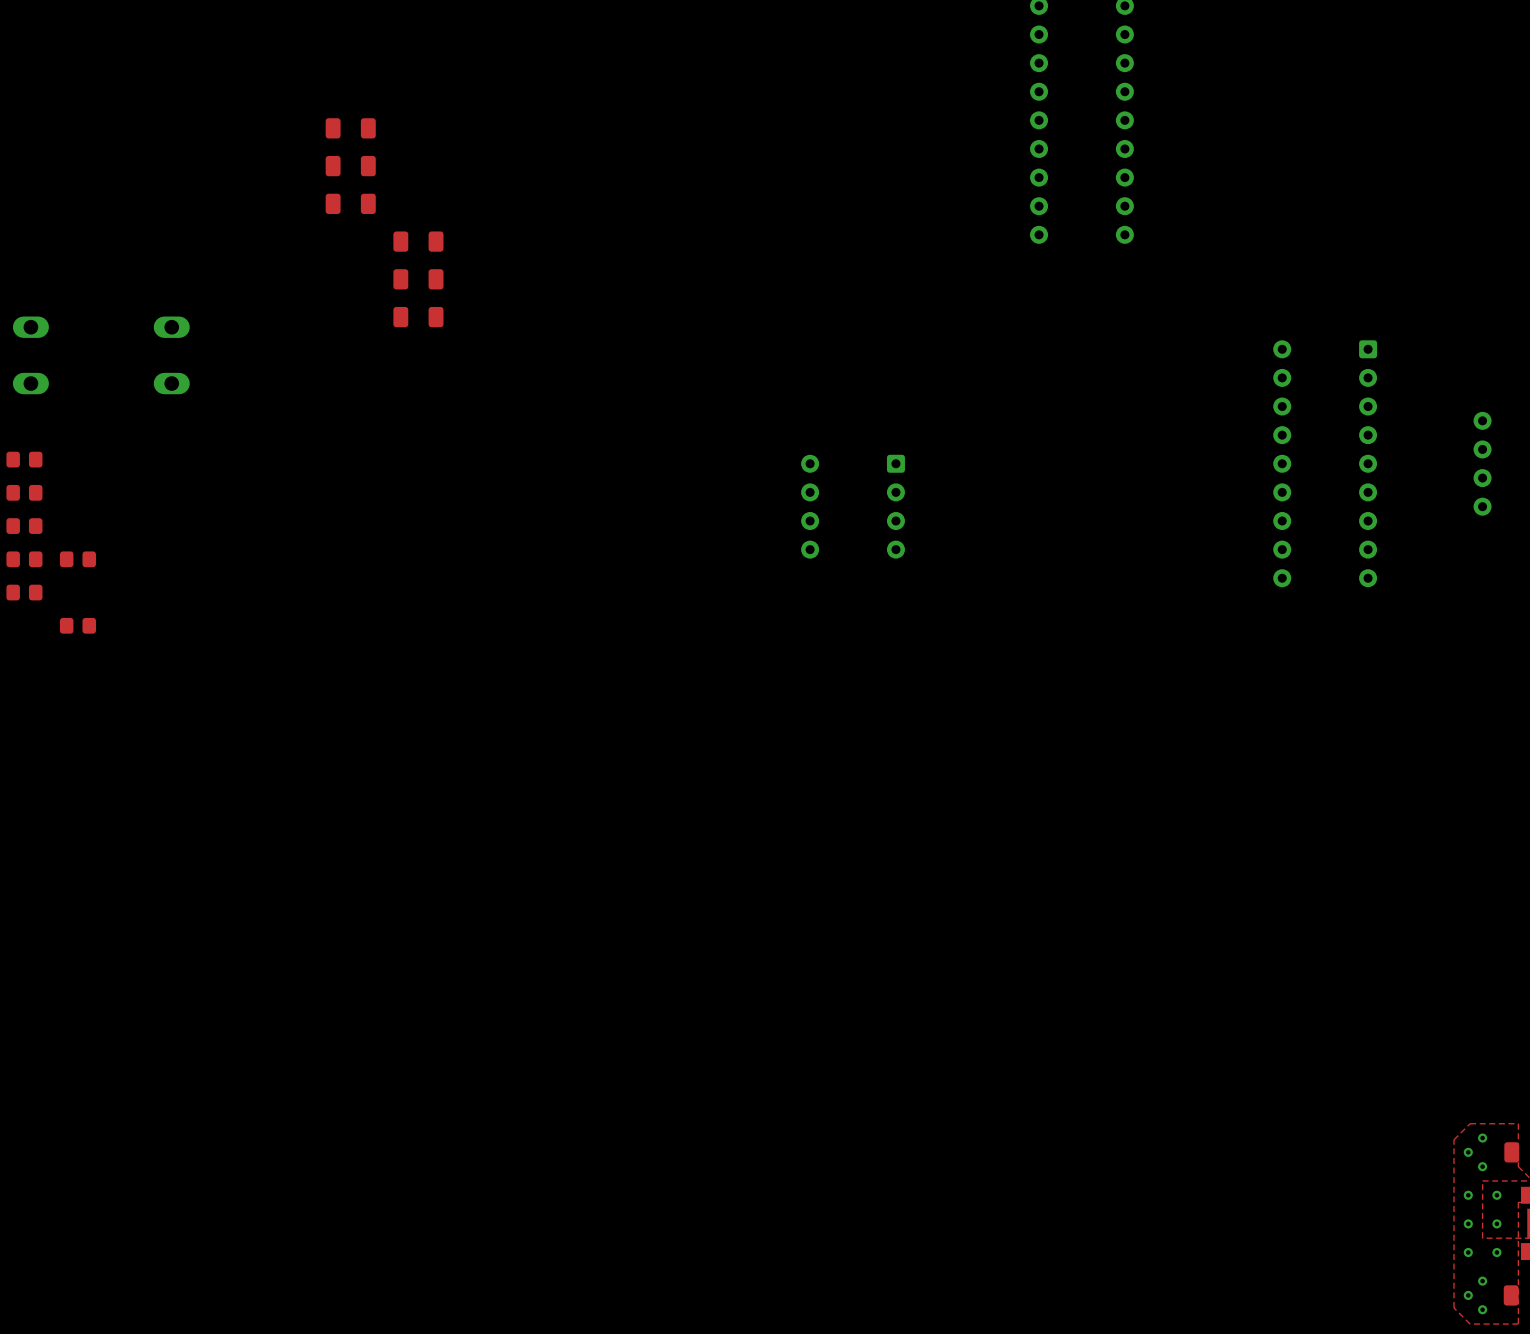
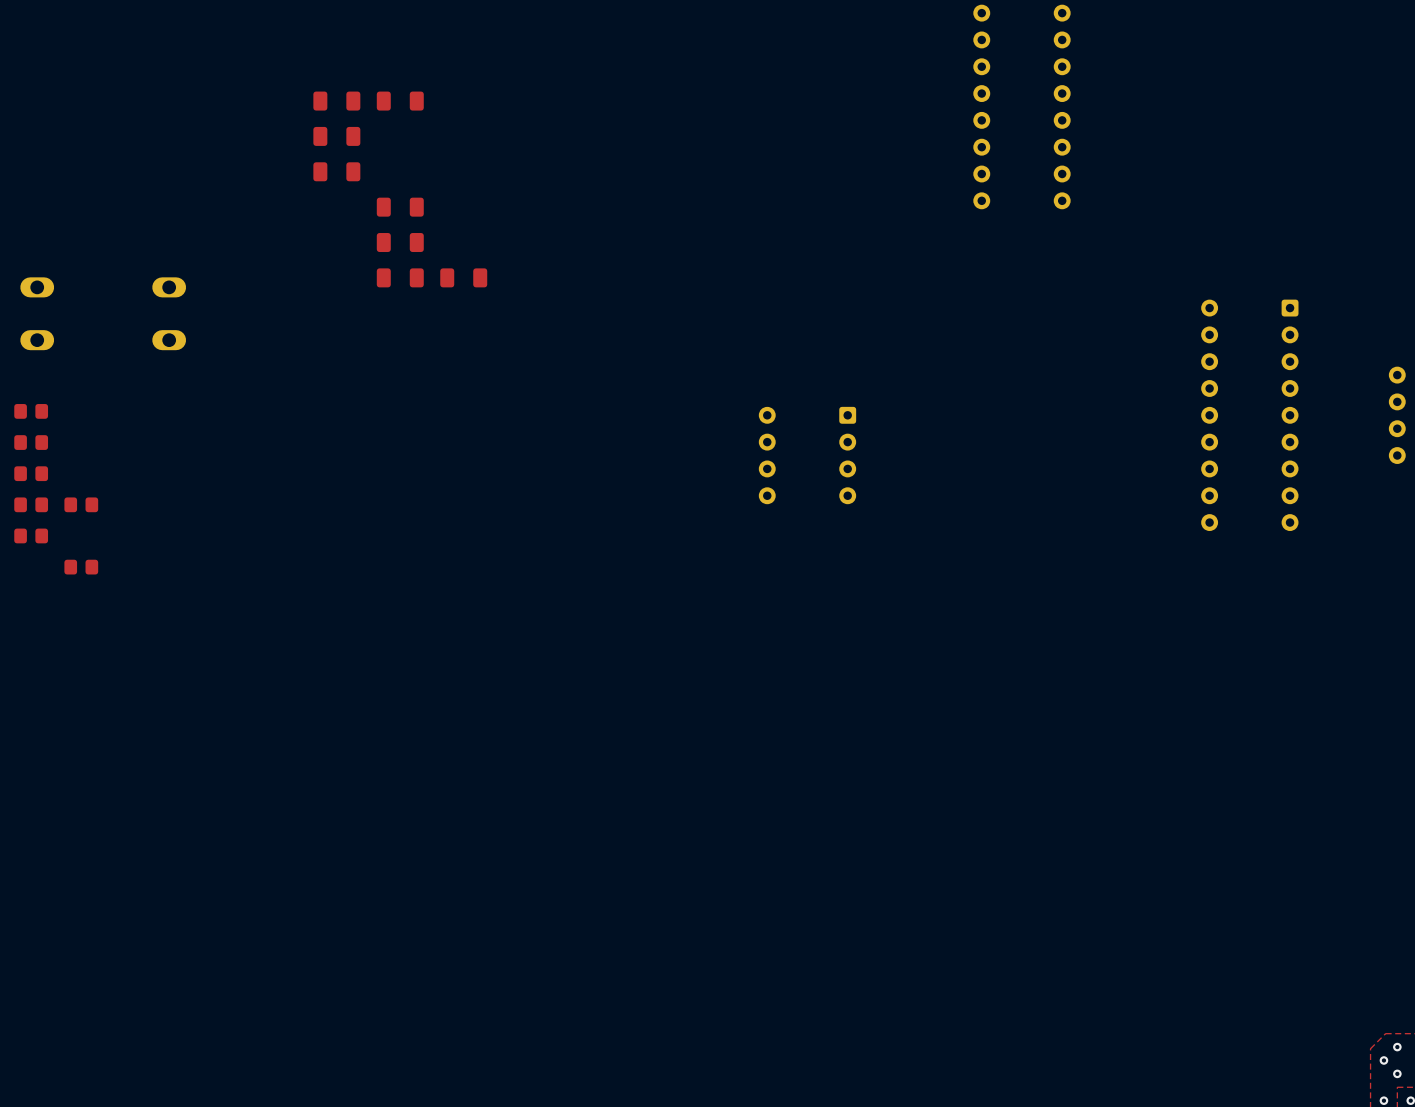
part: none -> (400, 101)
part: none -> (463, 277)

